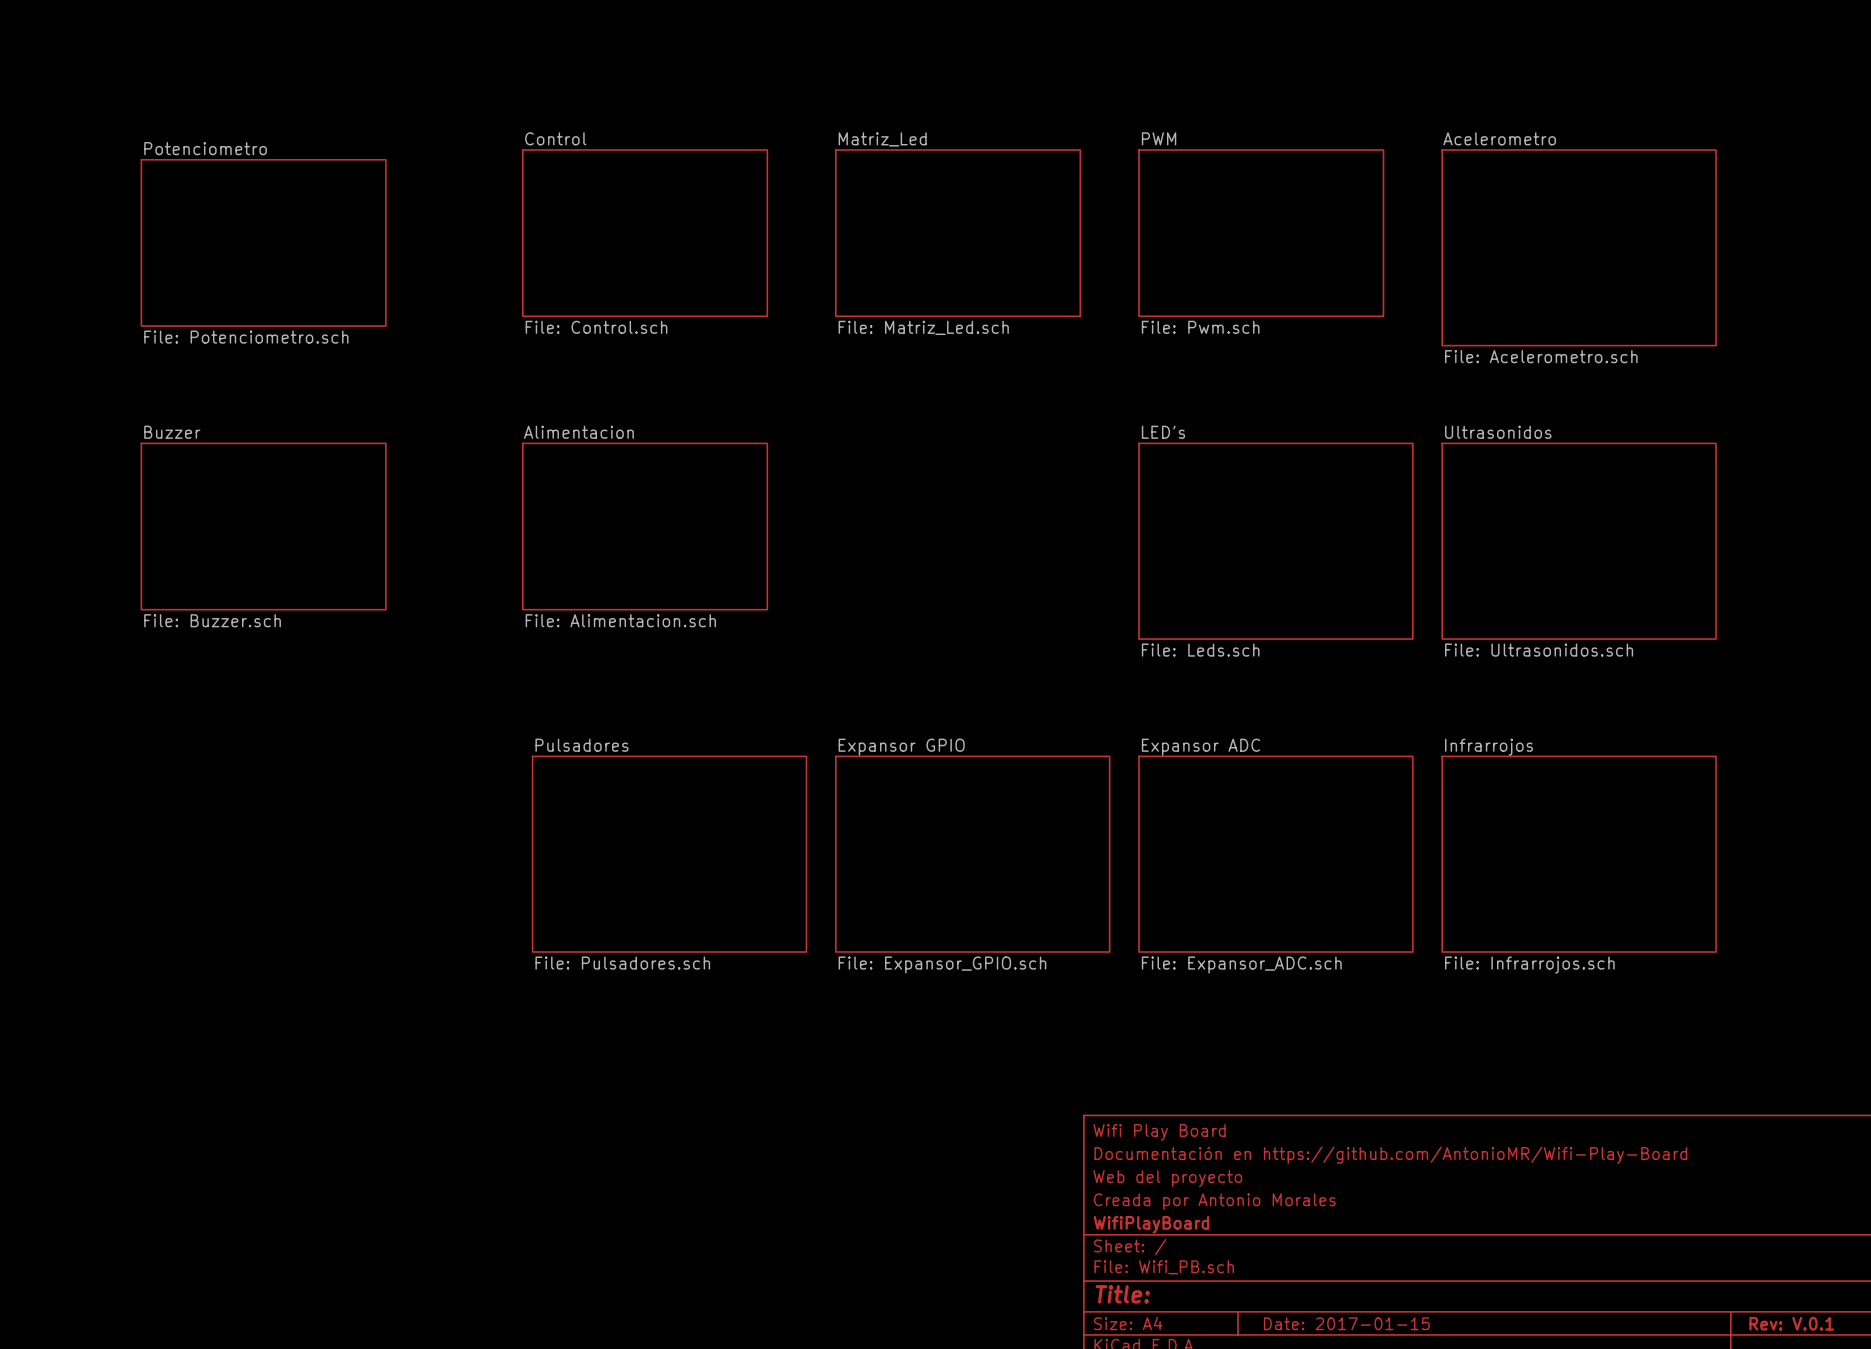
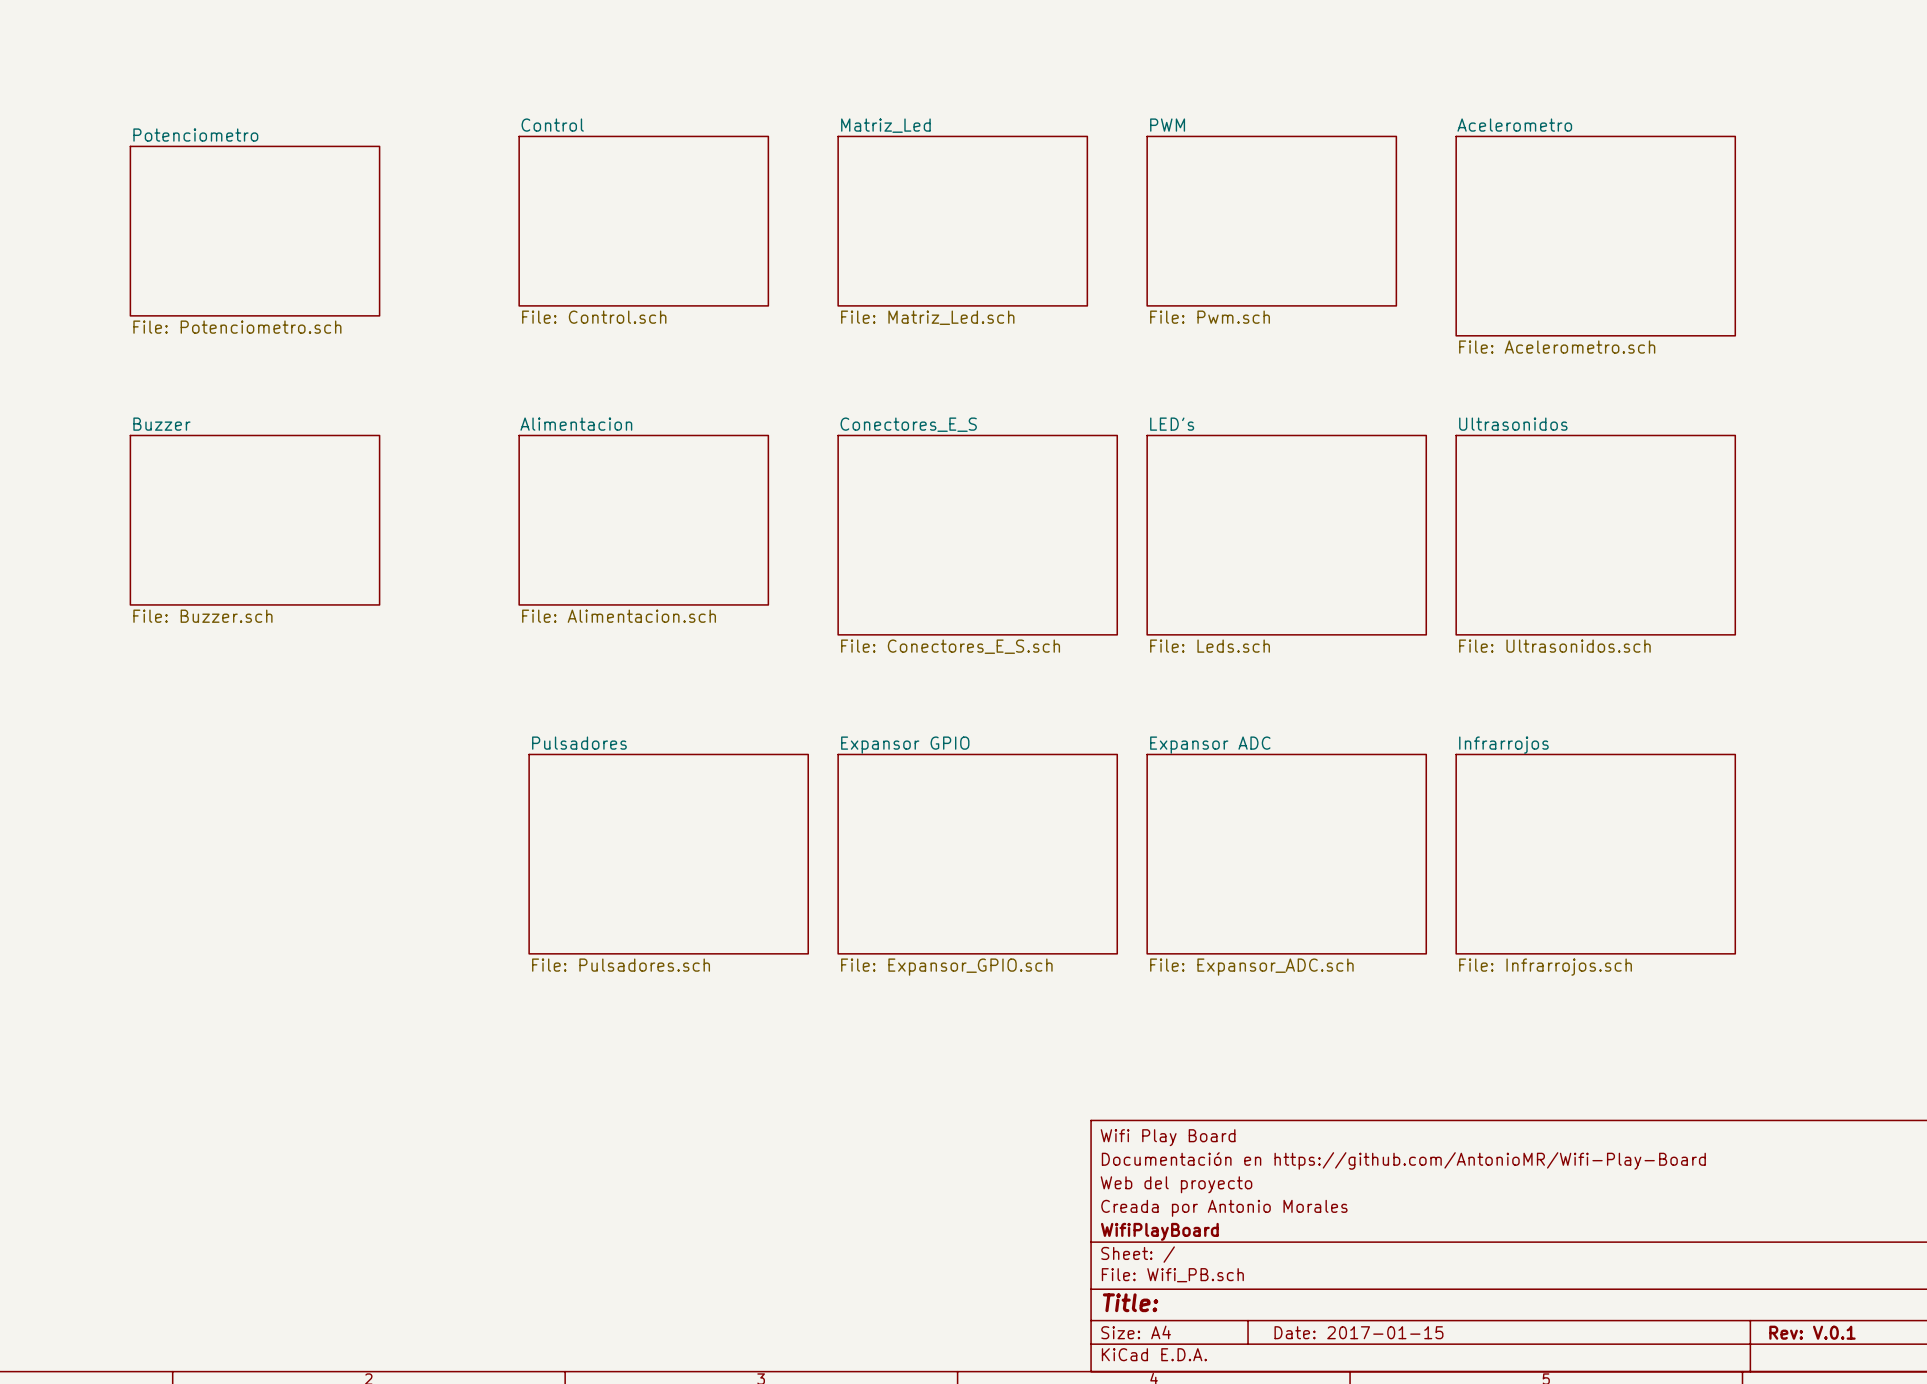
sheet Conectores_E_S: none -> File: Conectores_E_S.sch (977, 535)

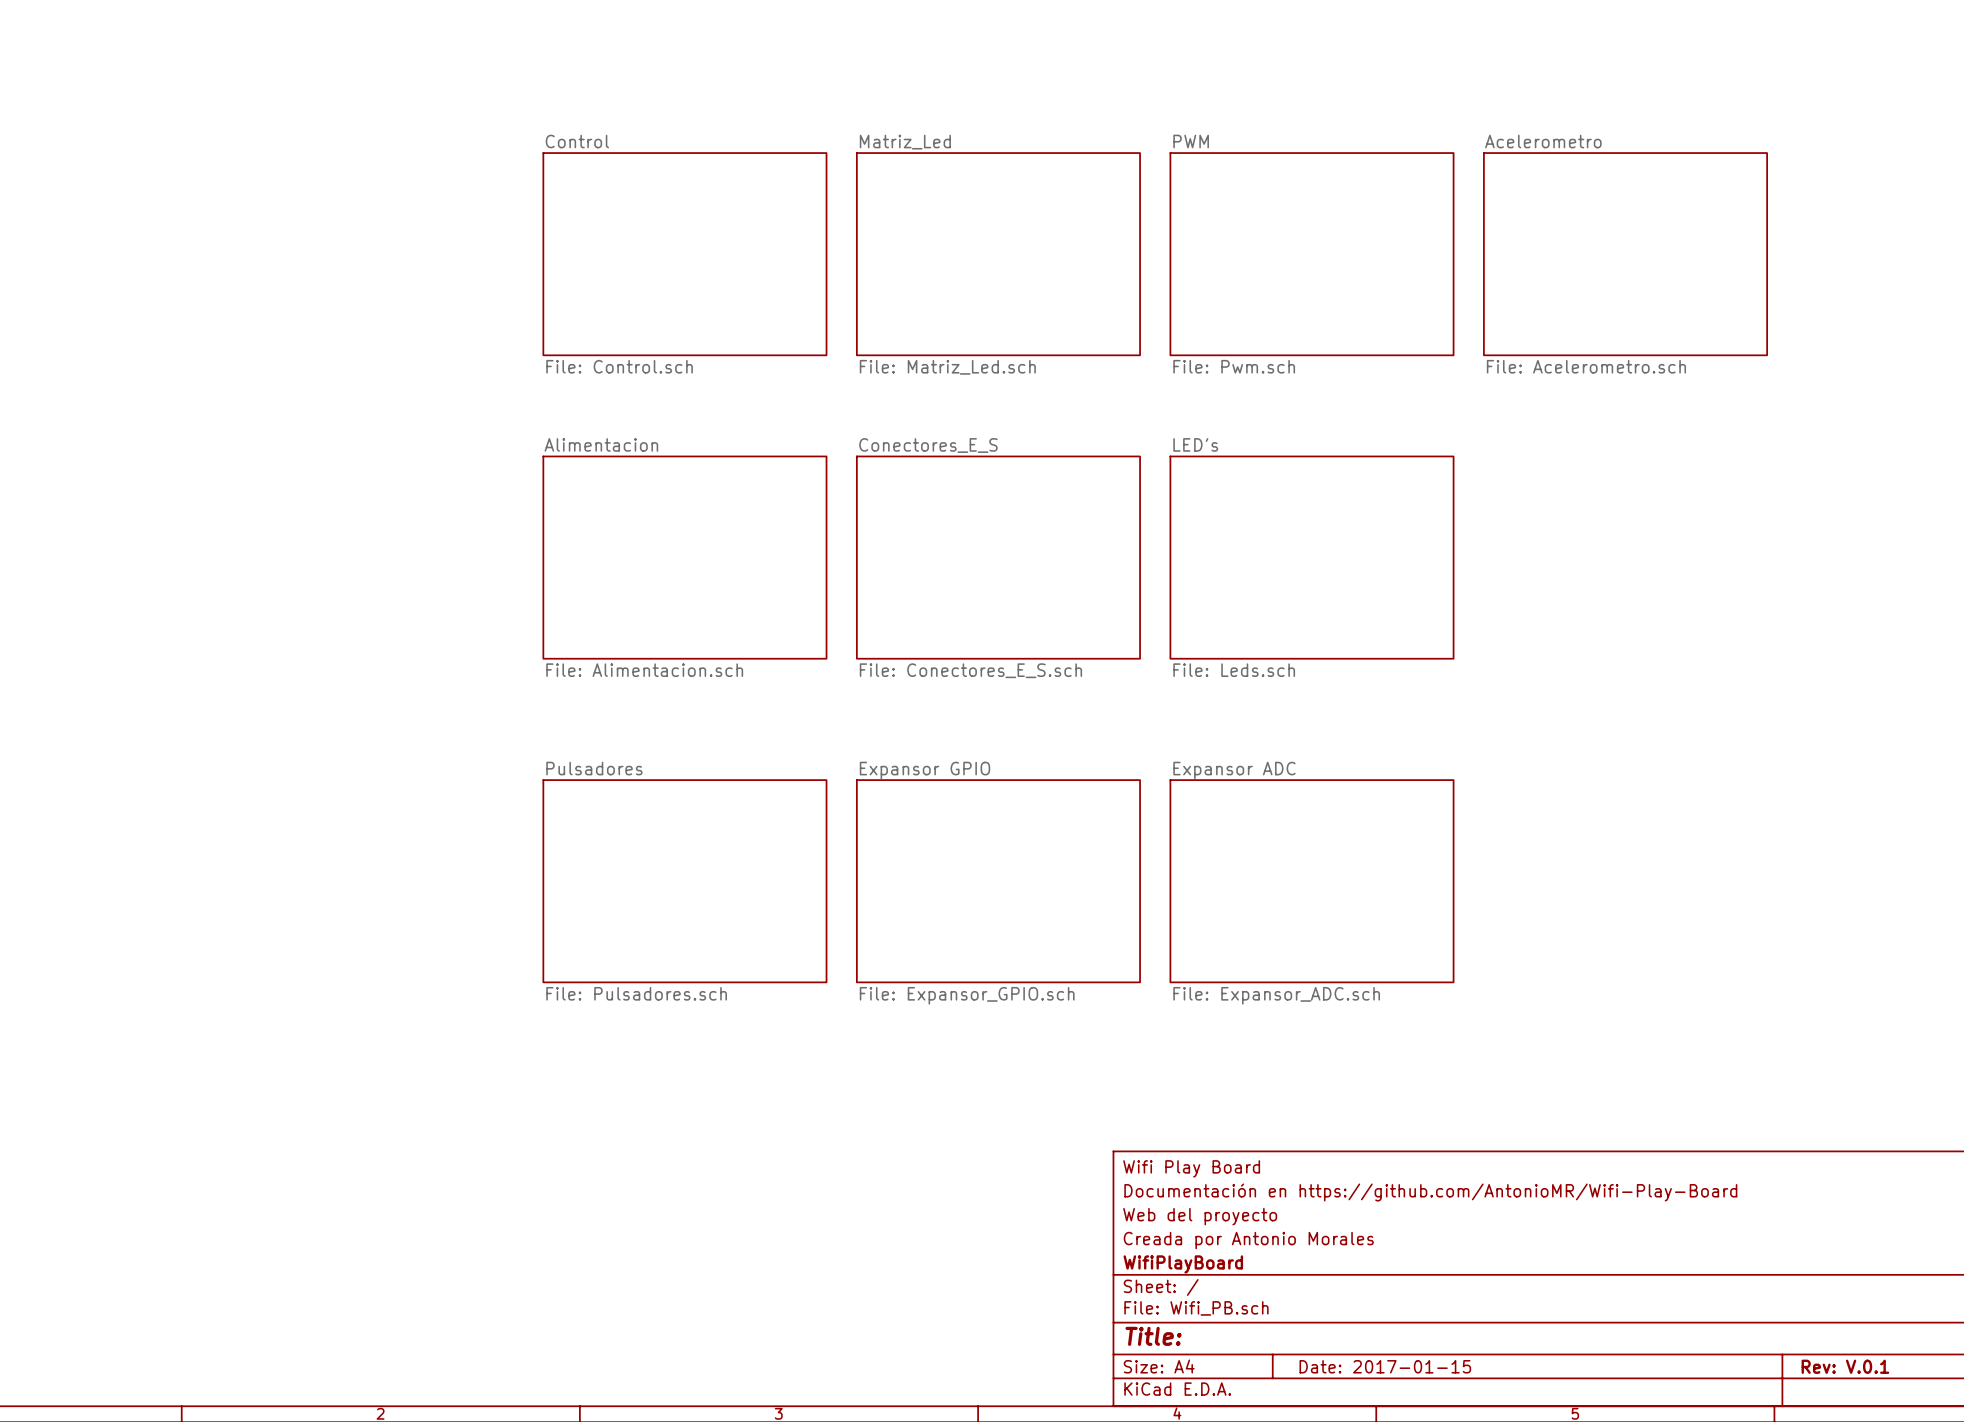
sheet Control: File: Control.sch (643, 221) -> none
sheet Matriz_Led: File: Matriz_Led.sch (962, 221) -> none
sheet PWM: File: Pwm.sch (1271, 221) -> none
sheet Potenciometro: File: Potenciometro.sch (254, 231) -> none
sheet Control: none -> File: Control.sch (684, 254)
sheet Matriz_Led: none -> File: Matriz_Led.sch (998, 254)
sheet PWM: none -> File: Pwm.sch (1311, 254)
sheet Buzzer: File: Buzzer.sch (254, 520) -> none
sheet Alimentacion: File: Alimentacion.sch (643, 520) -> none
sheet Alimentacion: none -> File: Alimentacion.sch (684, 557)
sheet Ultrasonidos: File: Ultrasonidos.sch (1595, 535) -> none
sheet Infrarrojos: File: Infrarrojos.sch (1595, 854) -> none

